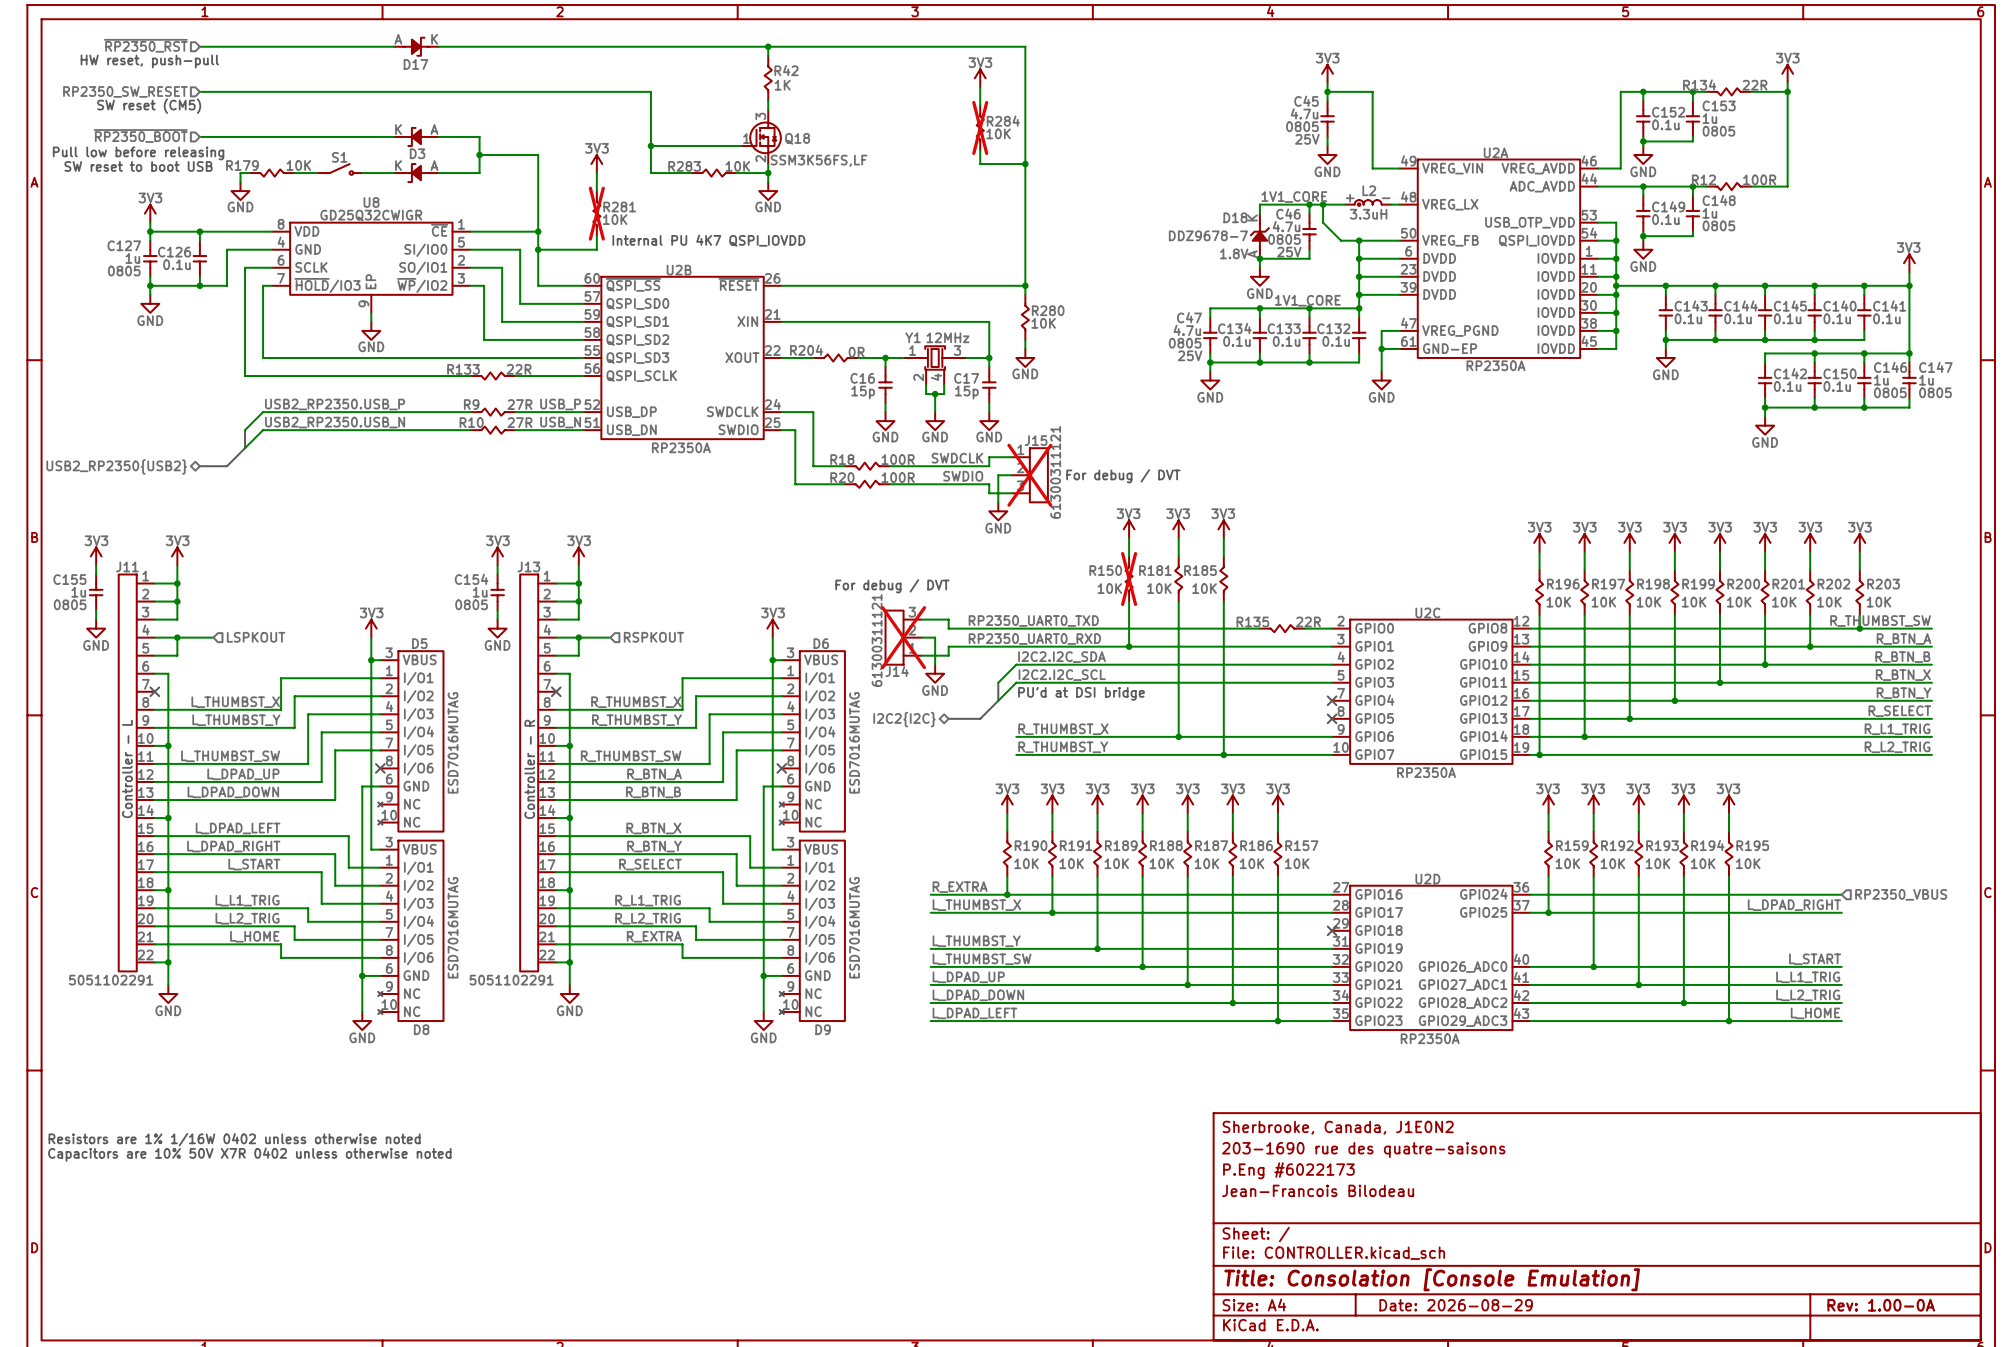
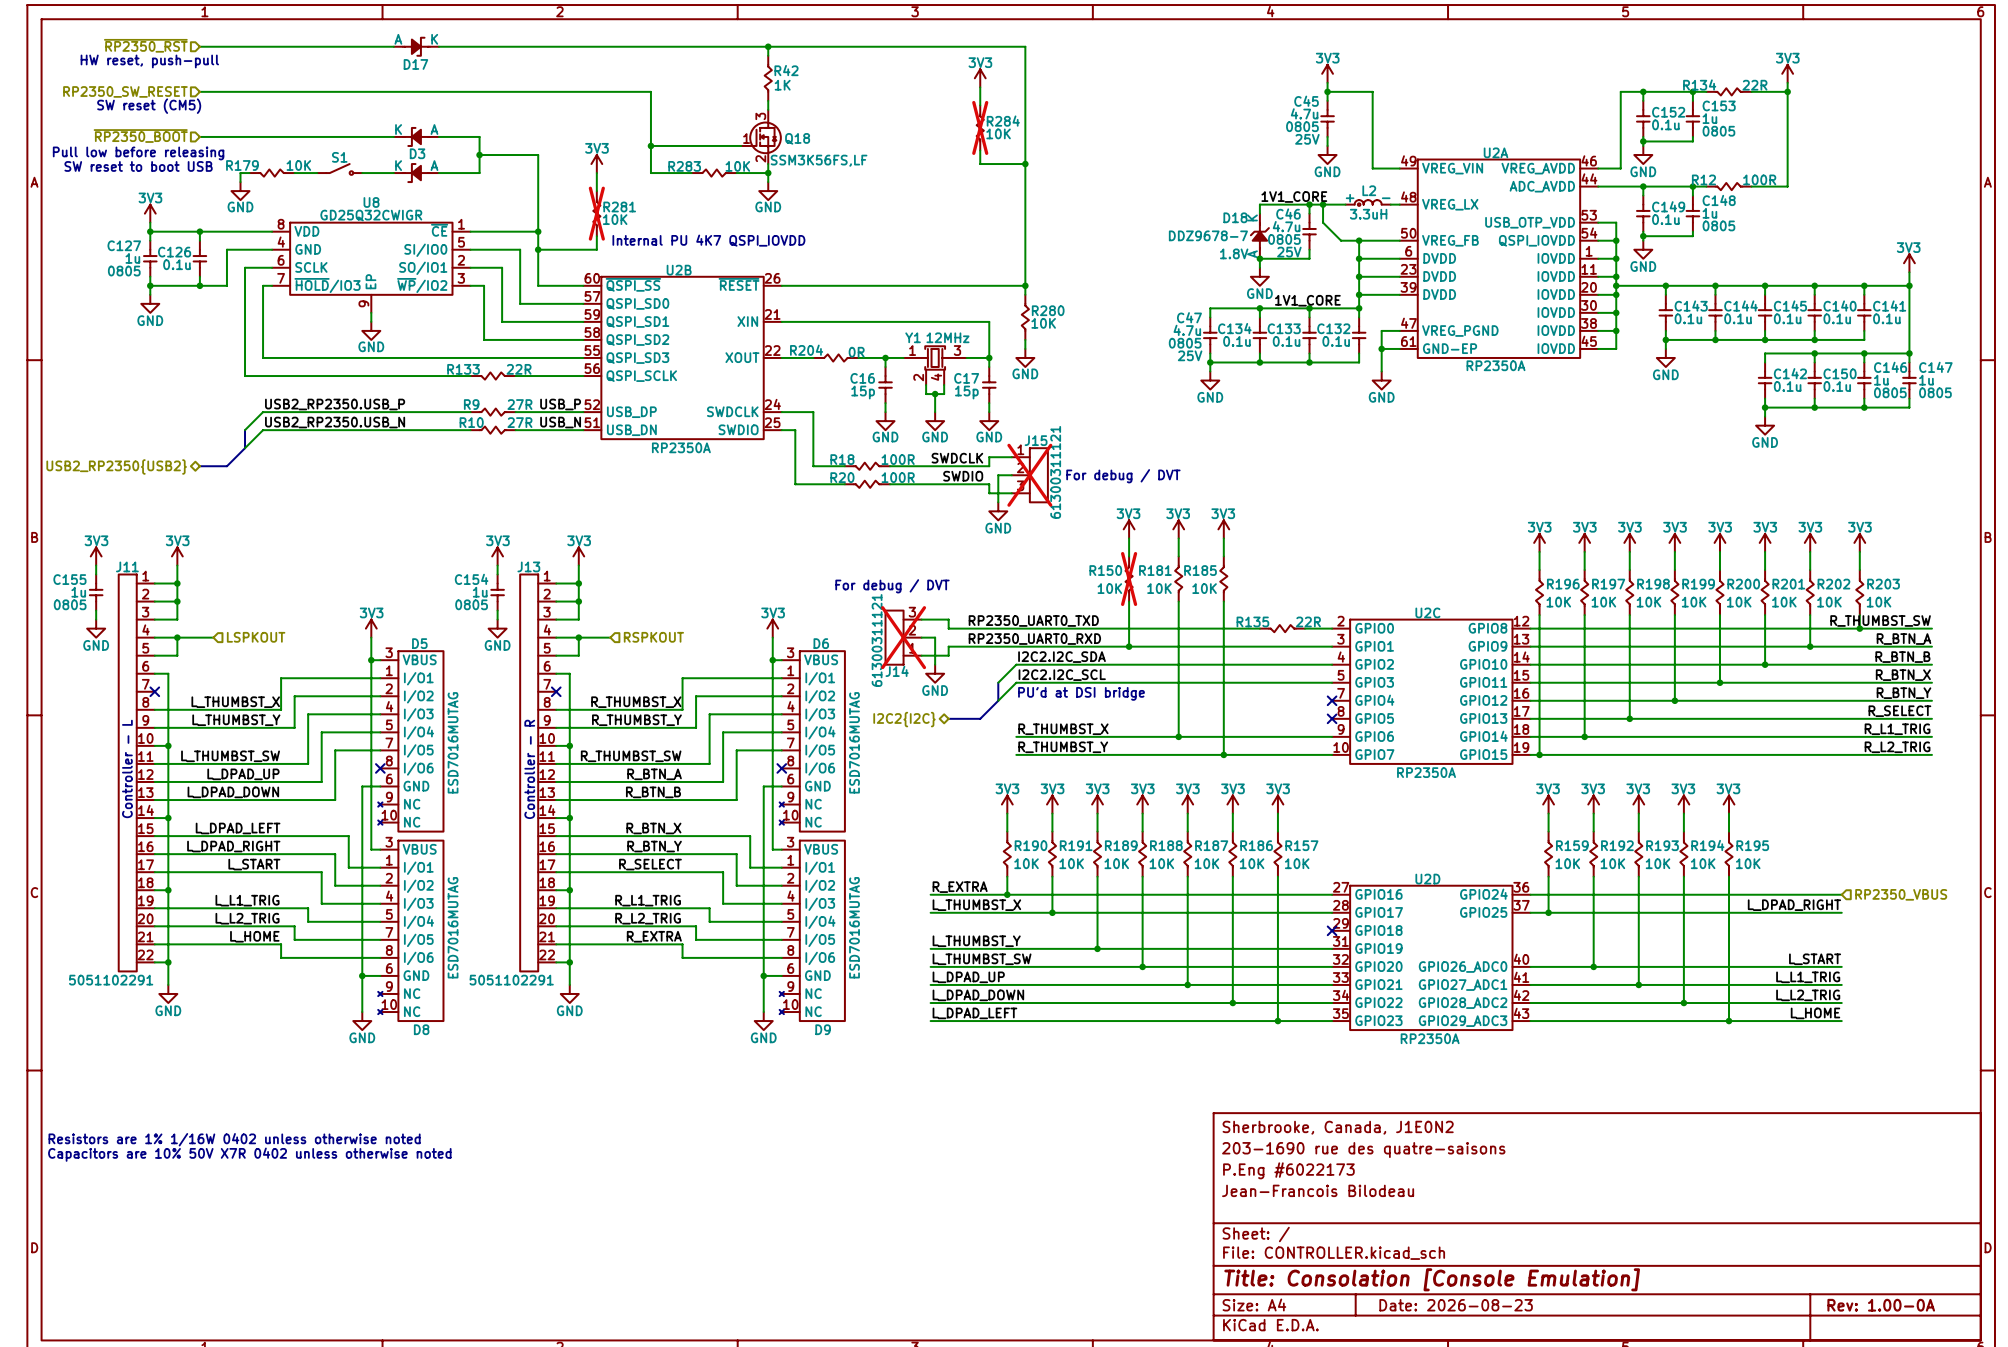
title block: Date: 2026-08-29 (1456, 1305) -> Date: 2026-08-23 (1456, 1305)

